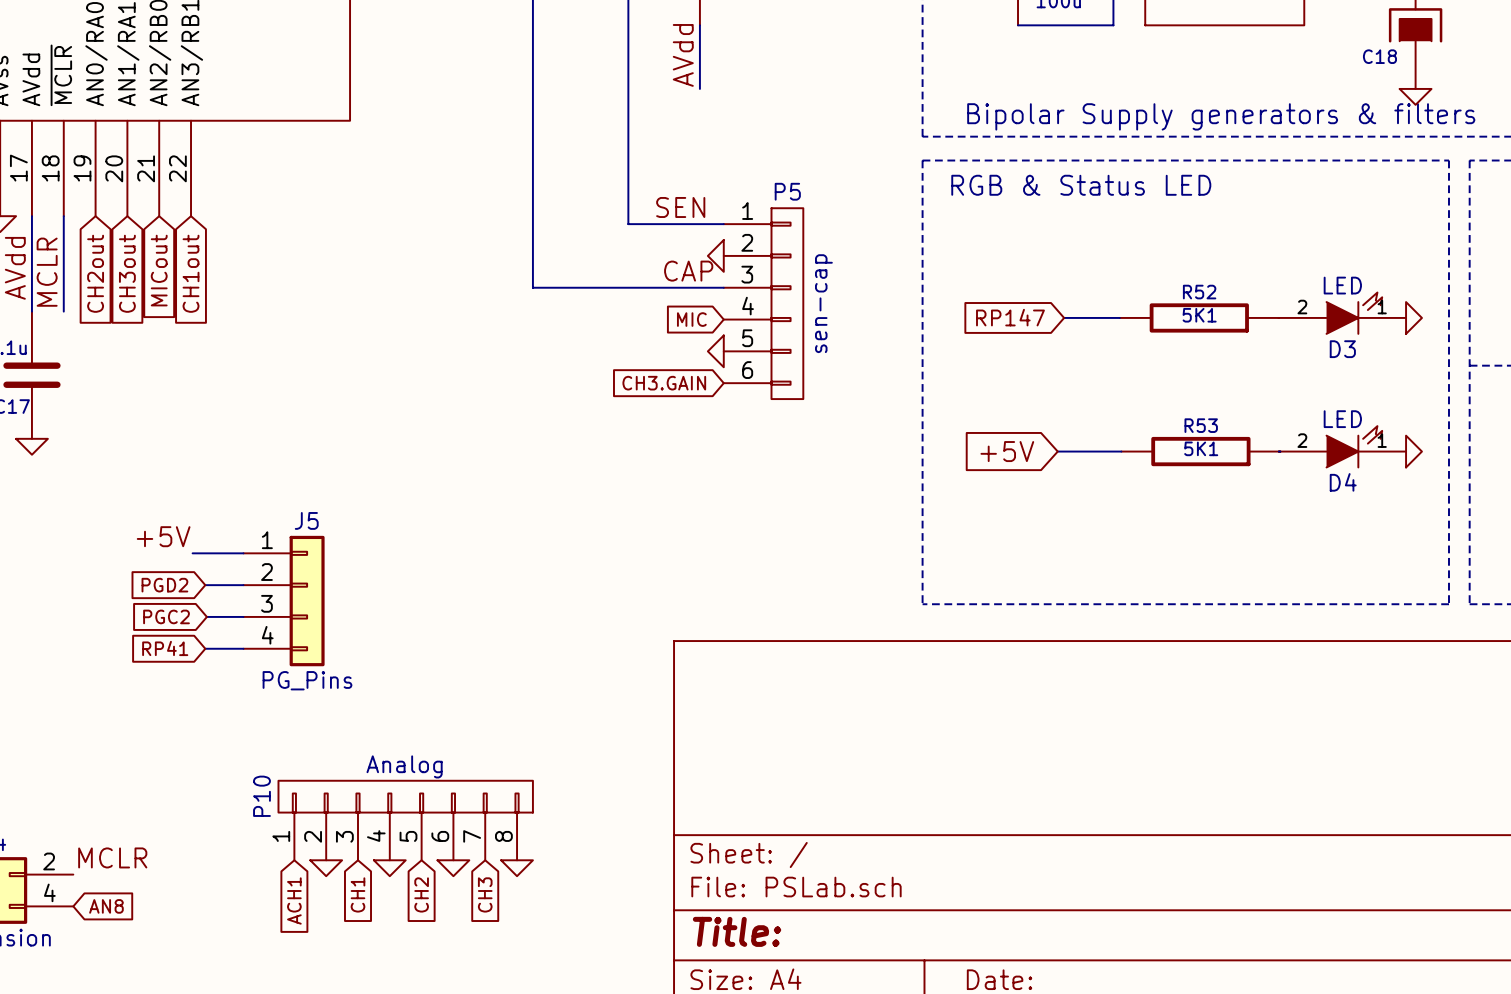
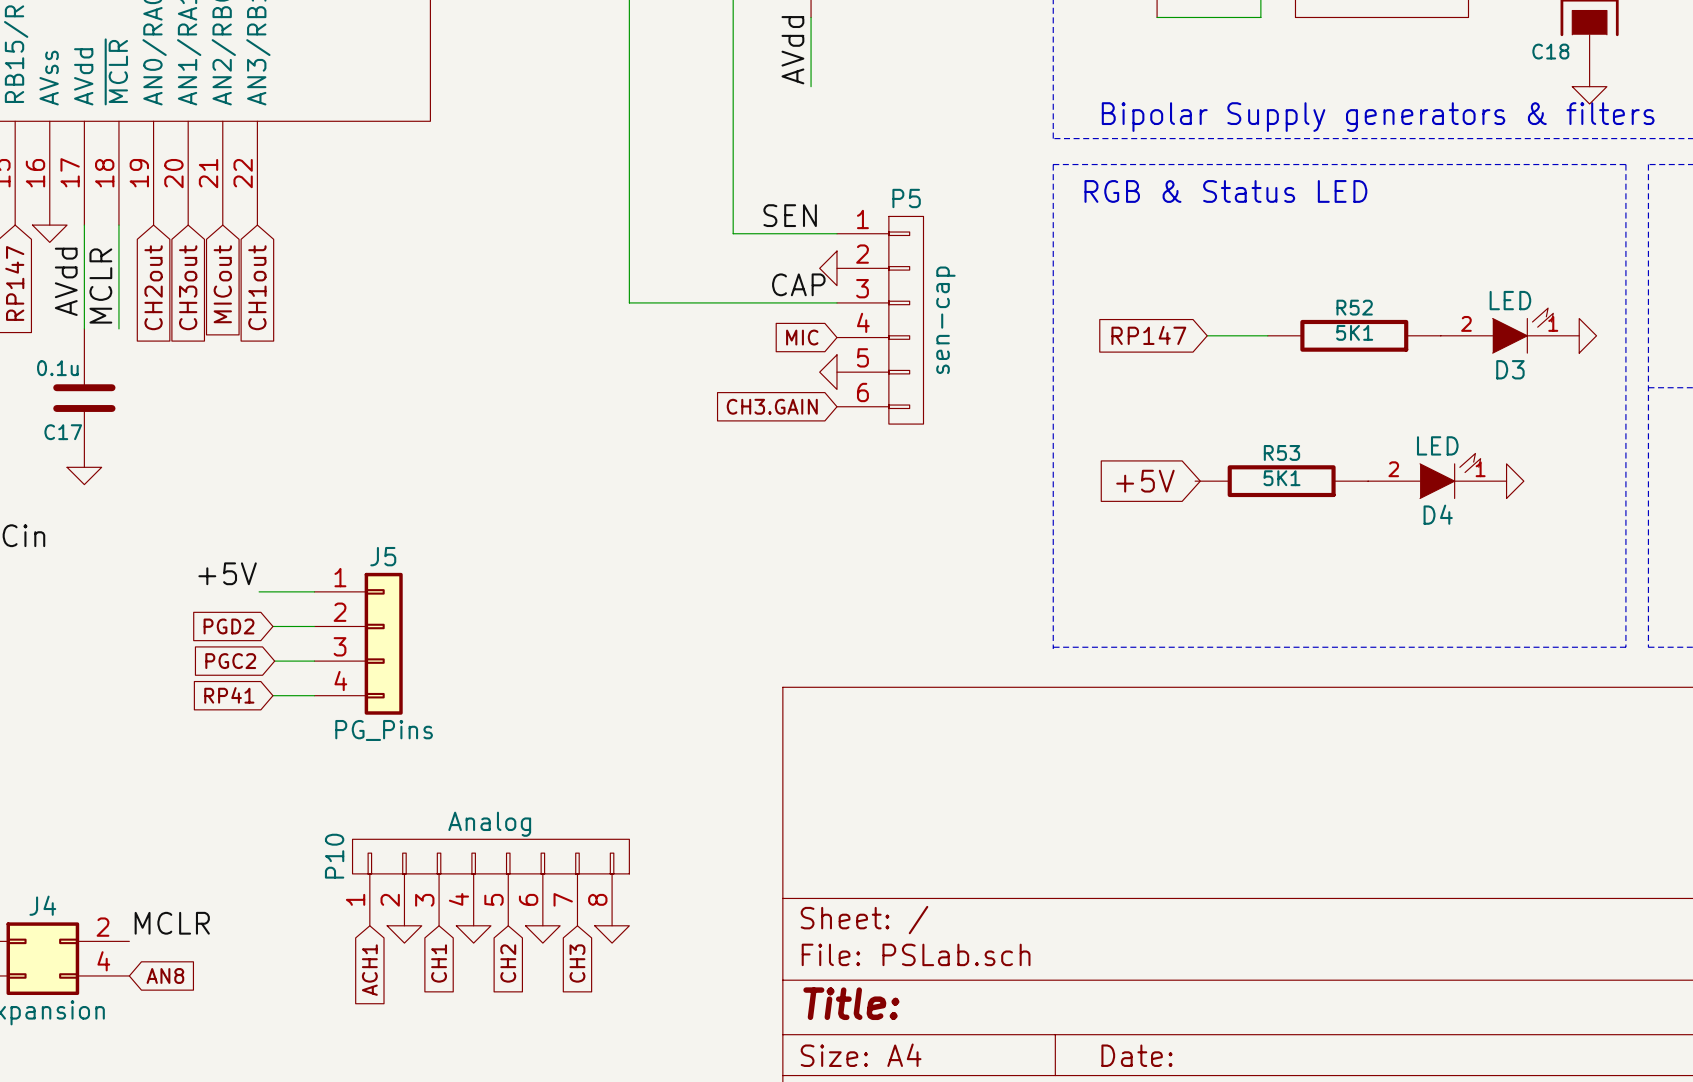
D4 position: (1342, 446) -> (1437, 475)
wire: (1057, 451) (1121, 451) -> none
R53 position: (1200, 451) -> (1281, 481)
power symbol position: (1414, 451) -> (1515, 481)

